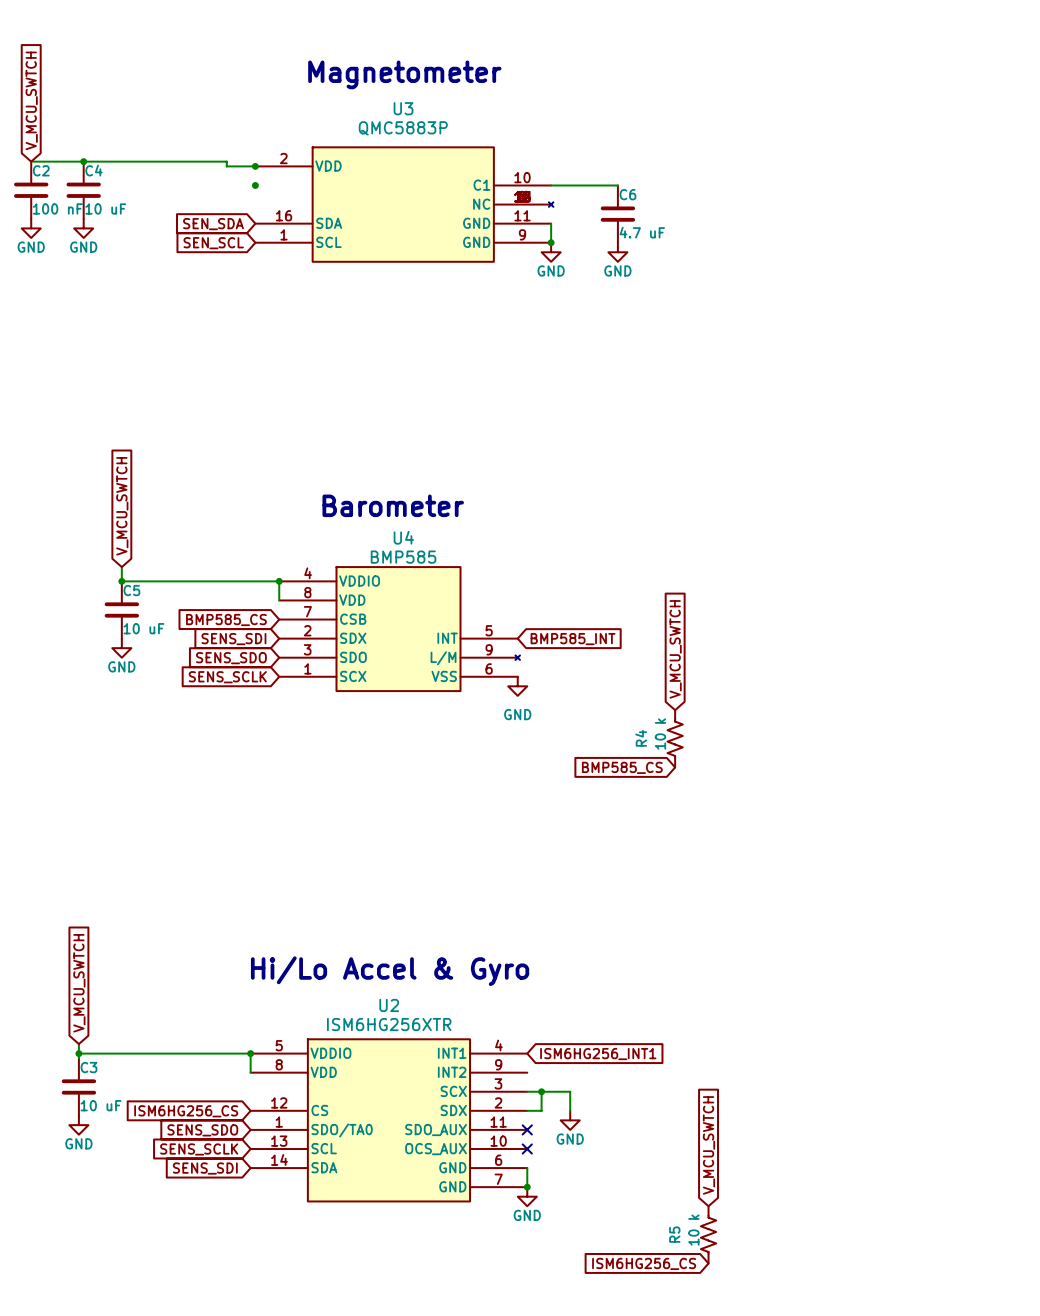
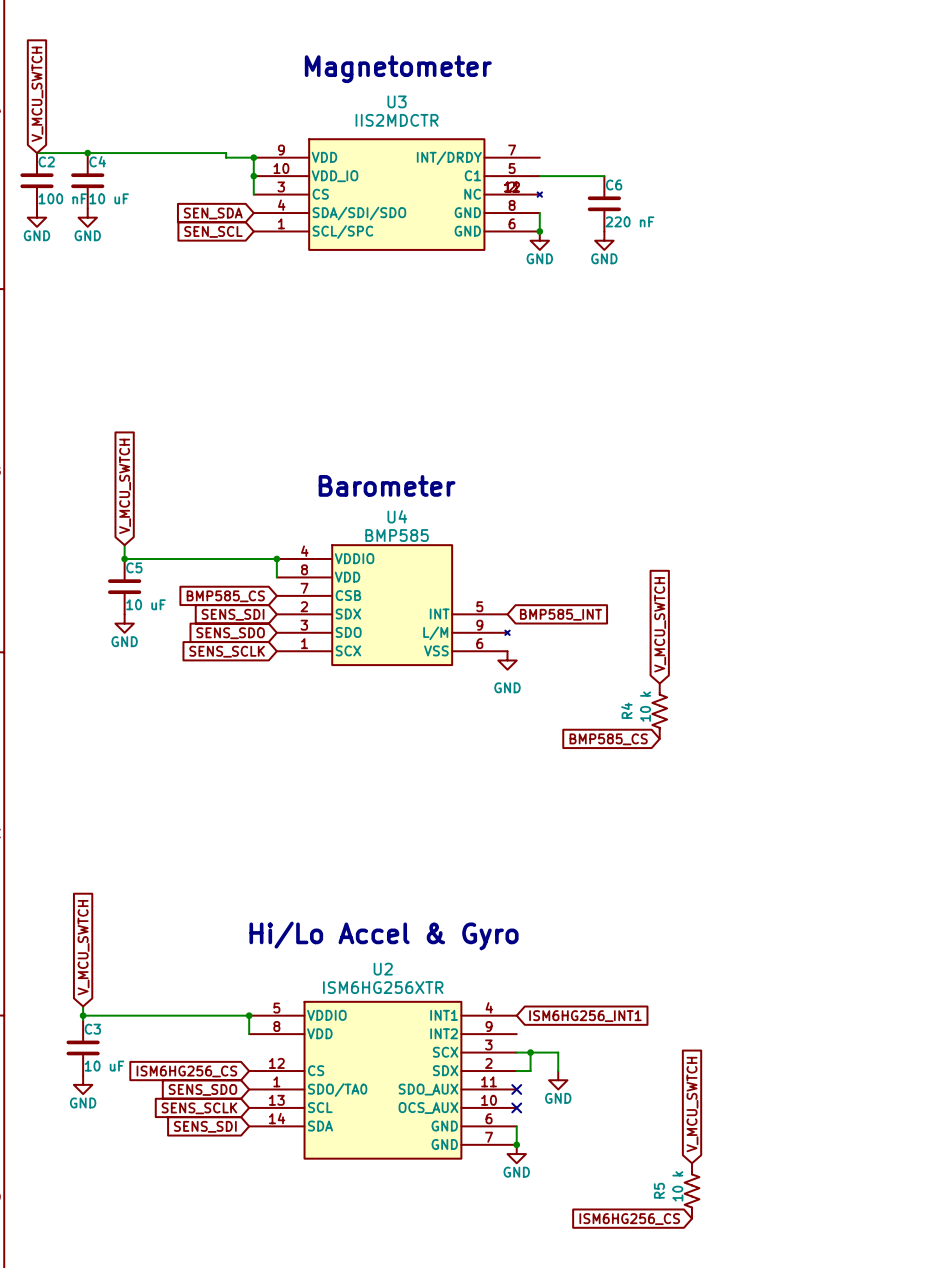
U3 value: QMC5883P (403, 128) -> IIS2MDCTR (397, 120)
U3 symbol: [255, 147, 554, 262] -> [253, 139, 542, 250]
wire: none -> (253, 157) (253, 194)
C6 value: 4.7 uF (642, 232) -> 220 nF (629, 221)

